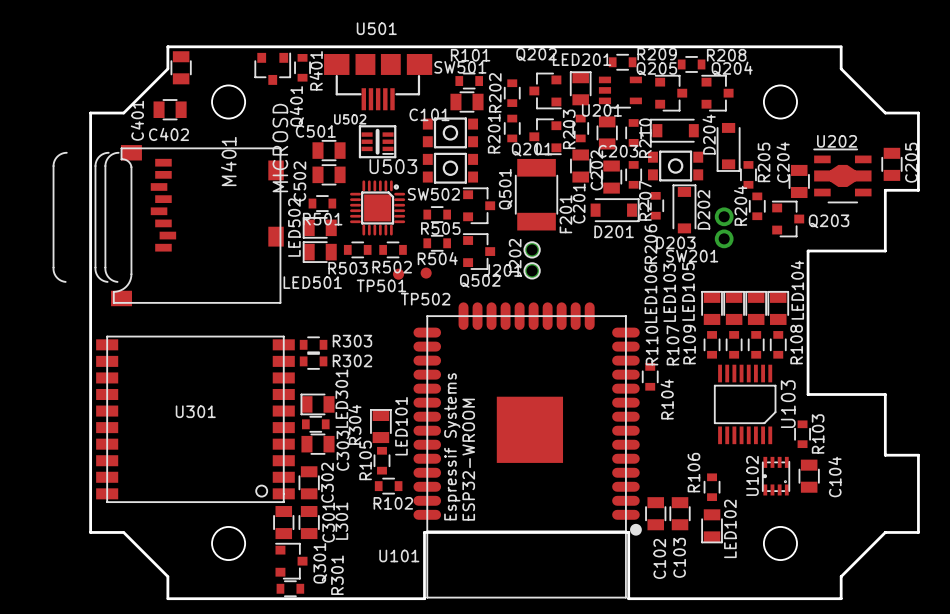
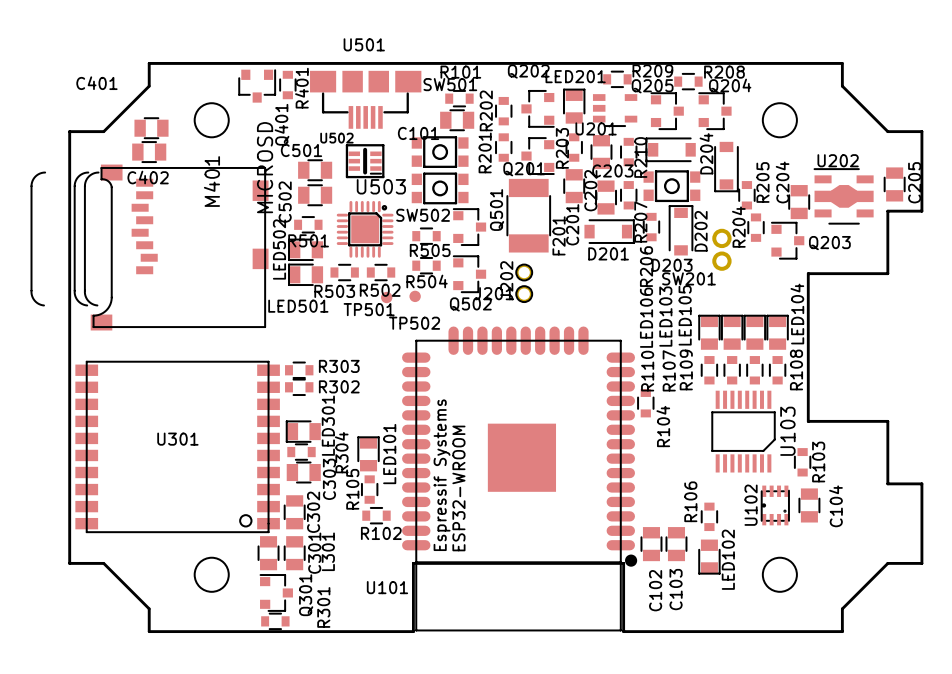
C401: (181, 67) -> none
C402: none -> (149, 152)
C402 name: C402 (168, 134) -> C401 (96, 83)

